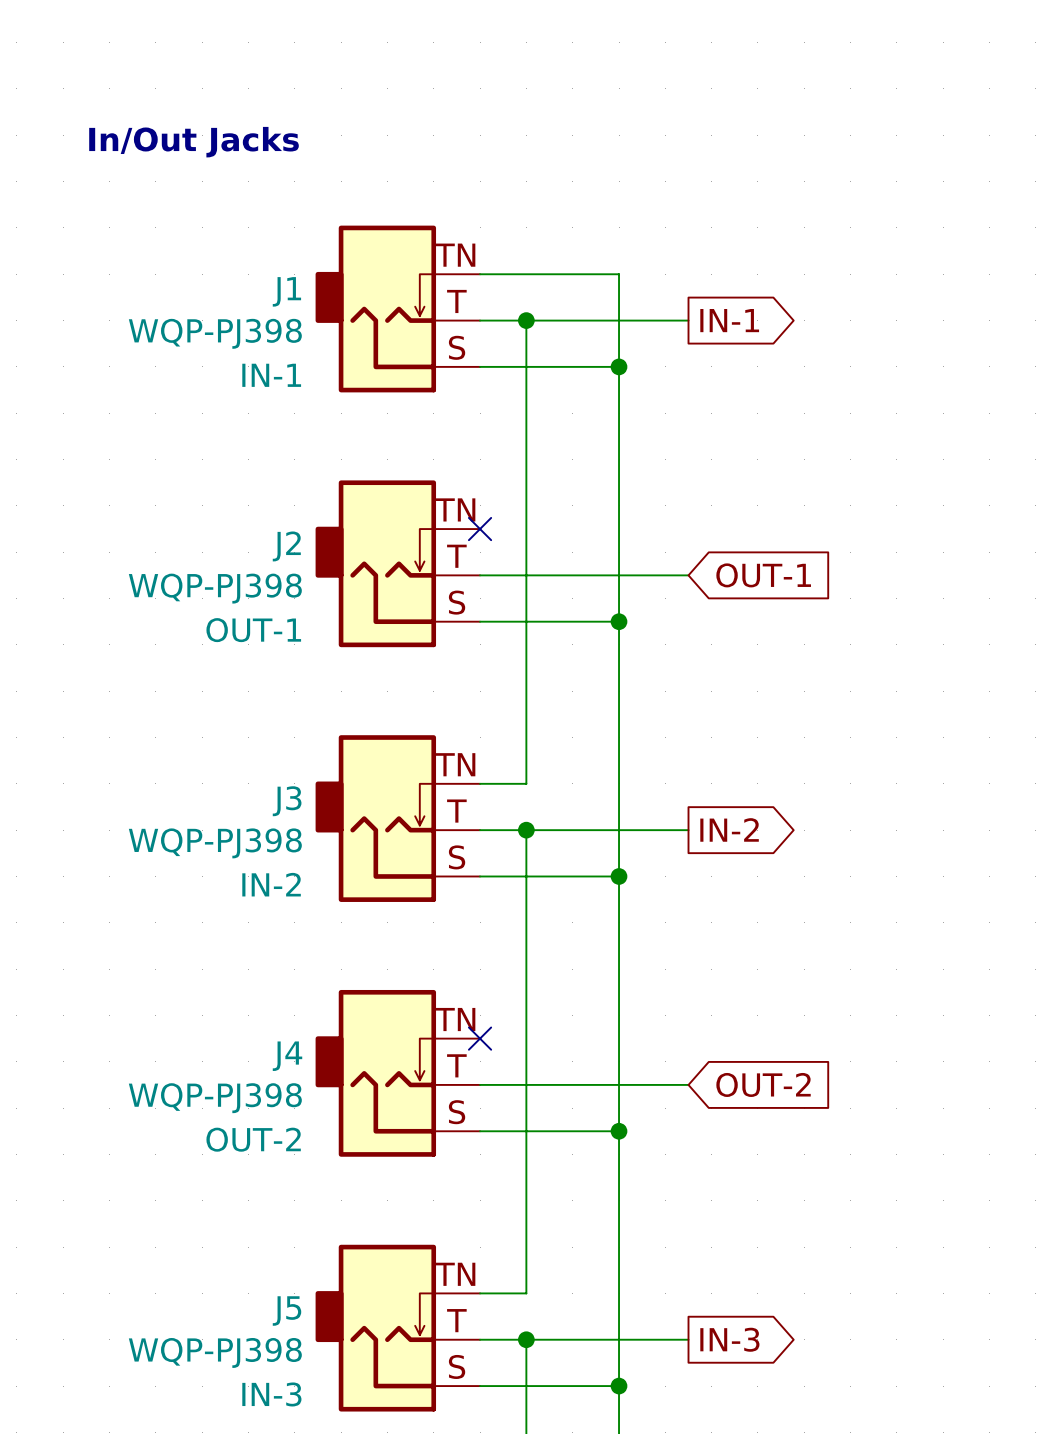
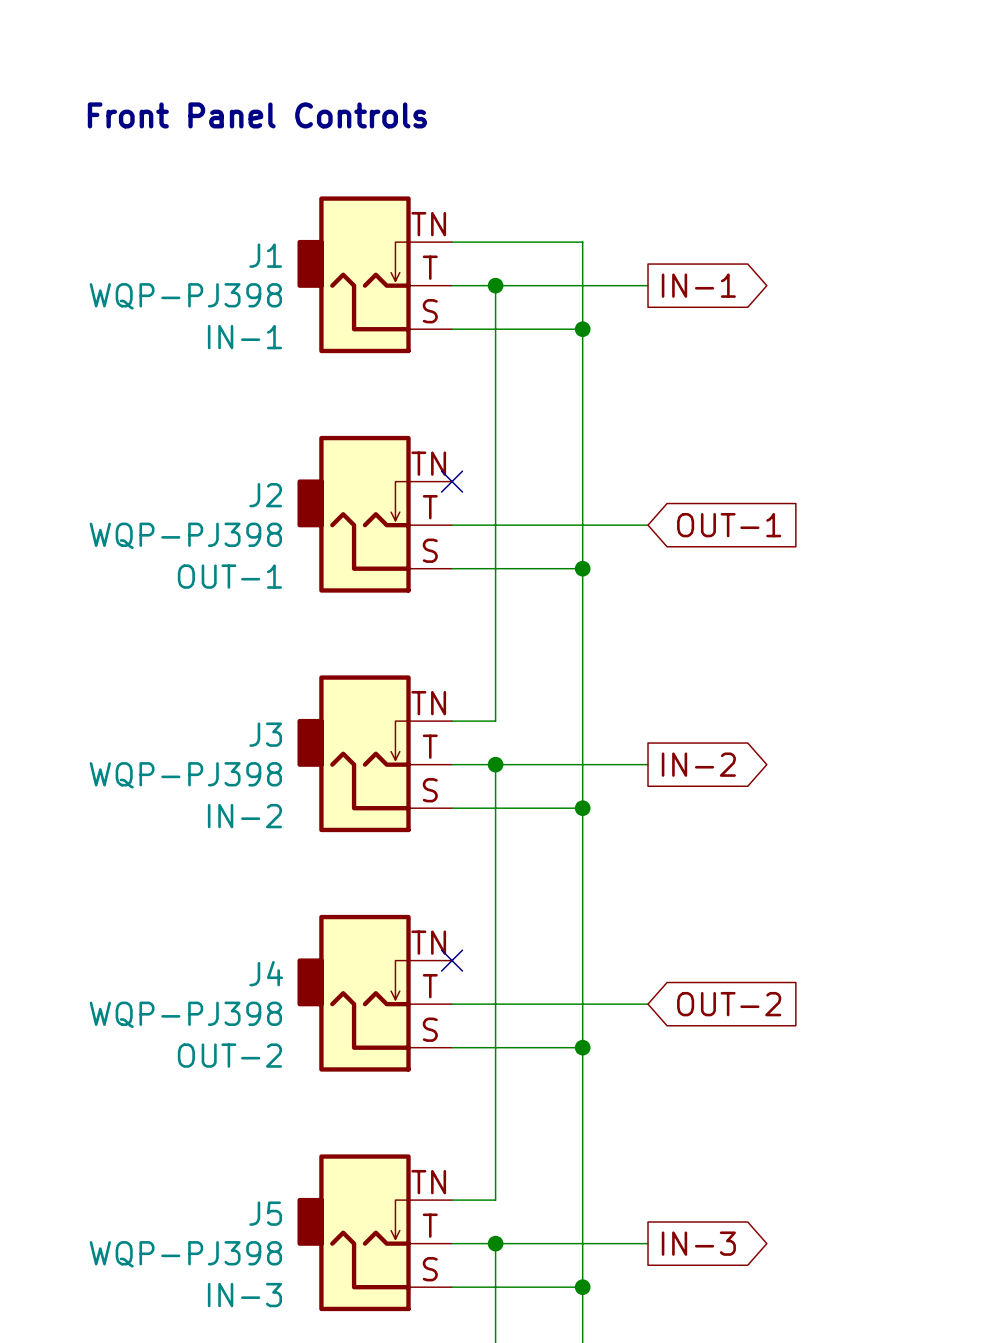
text: In/Out Jacks (194, 142) -> Front Panel Controls (257, 115)

